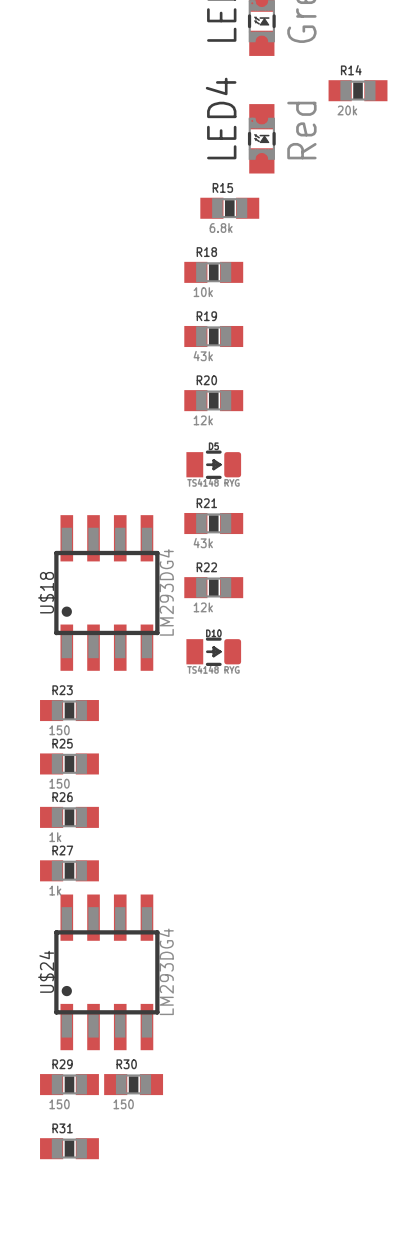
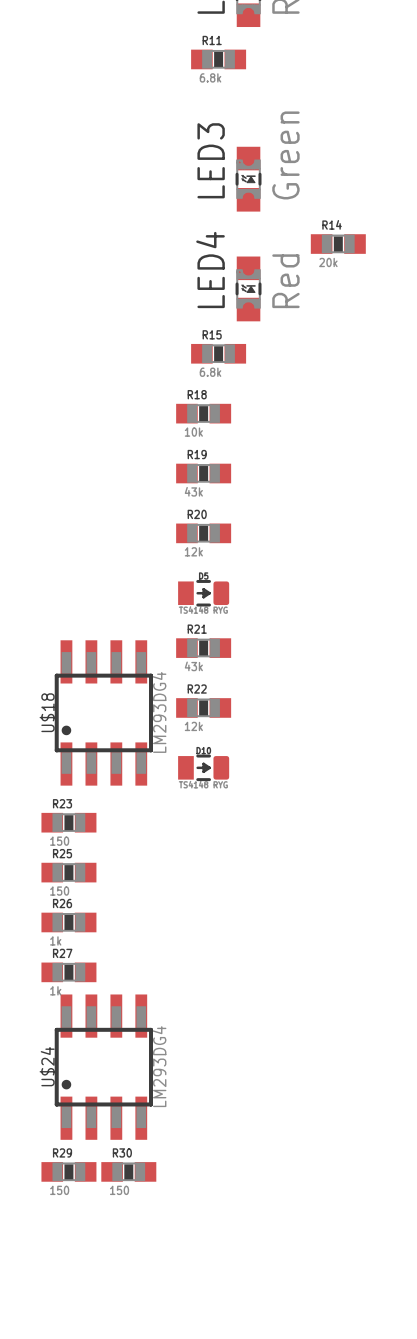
R31: (69, 1148) -> none

